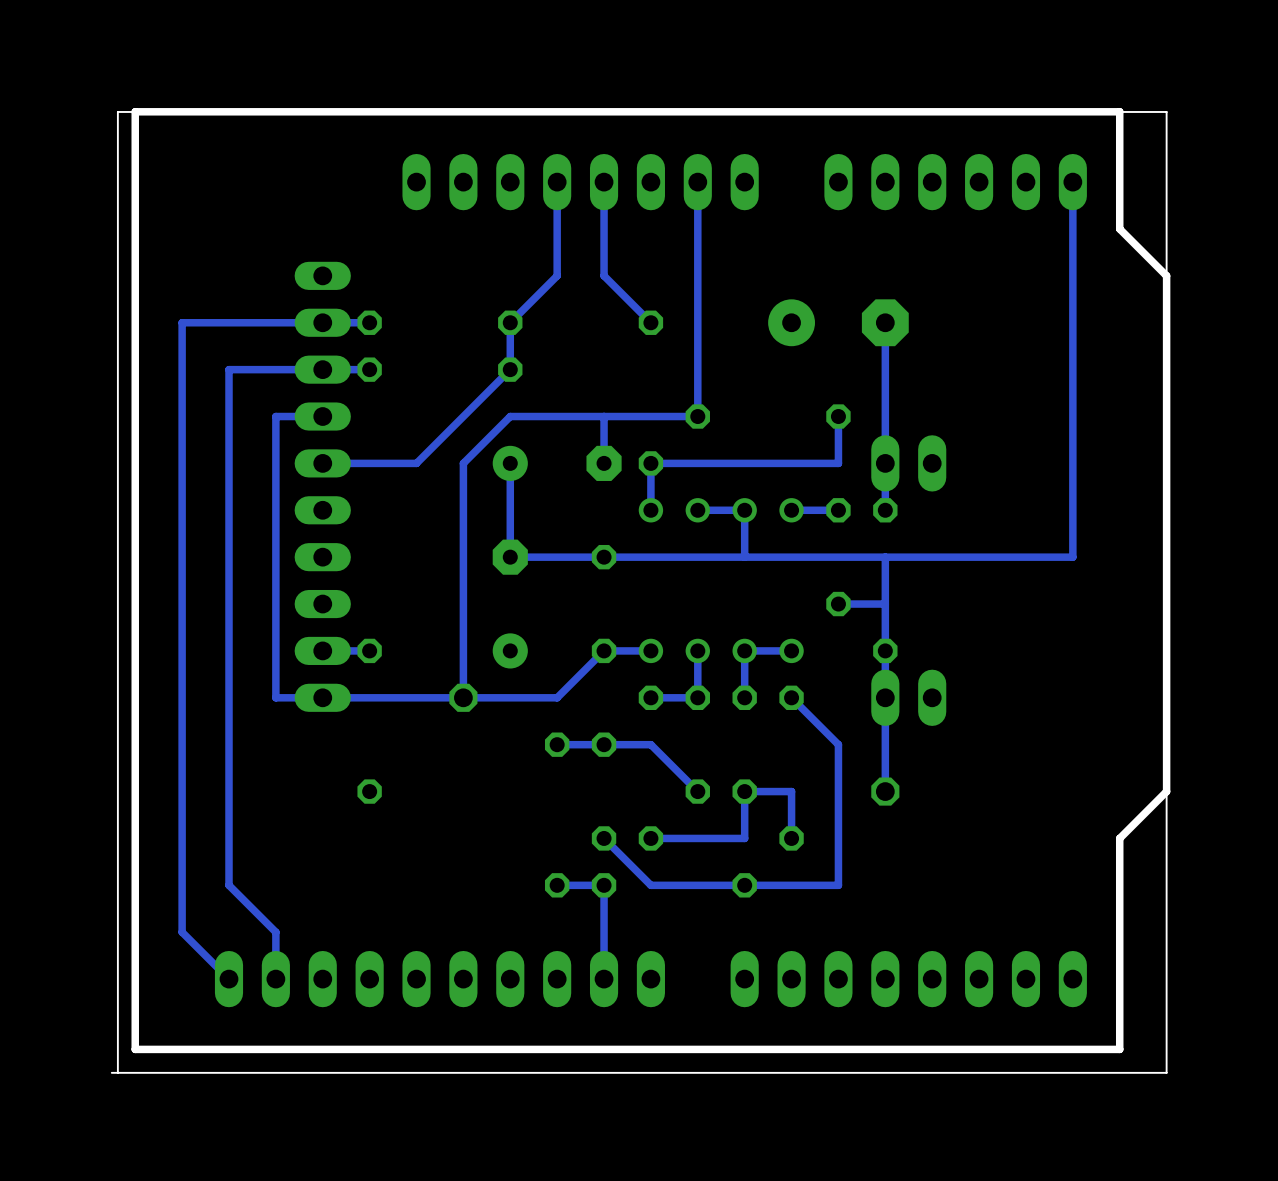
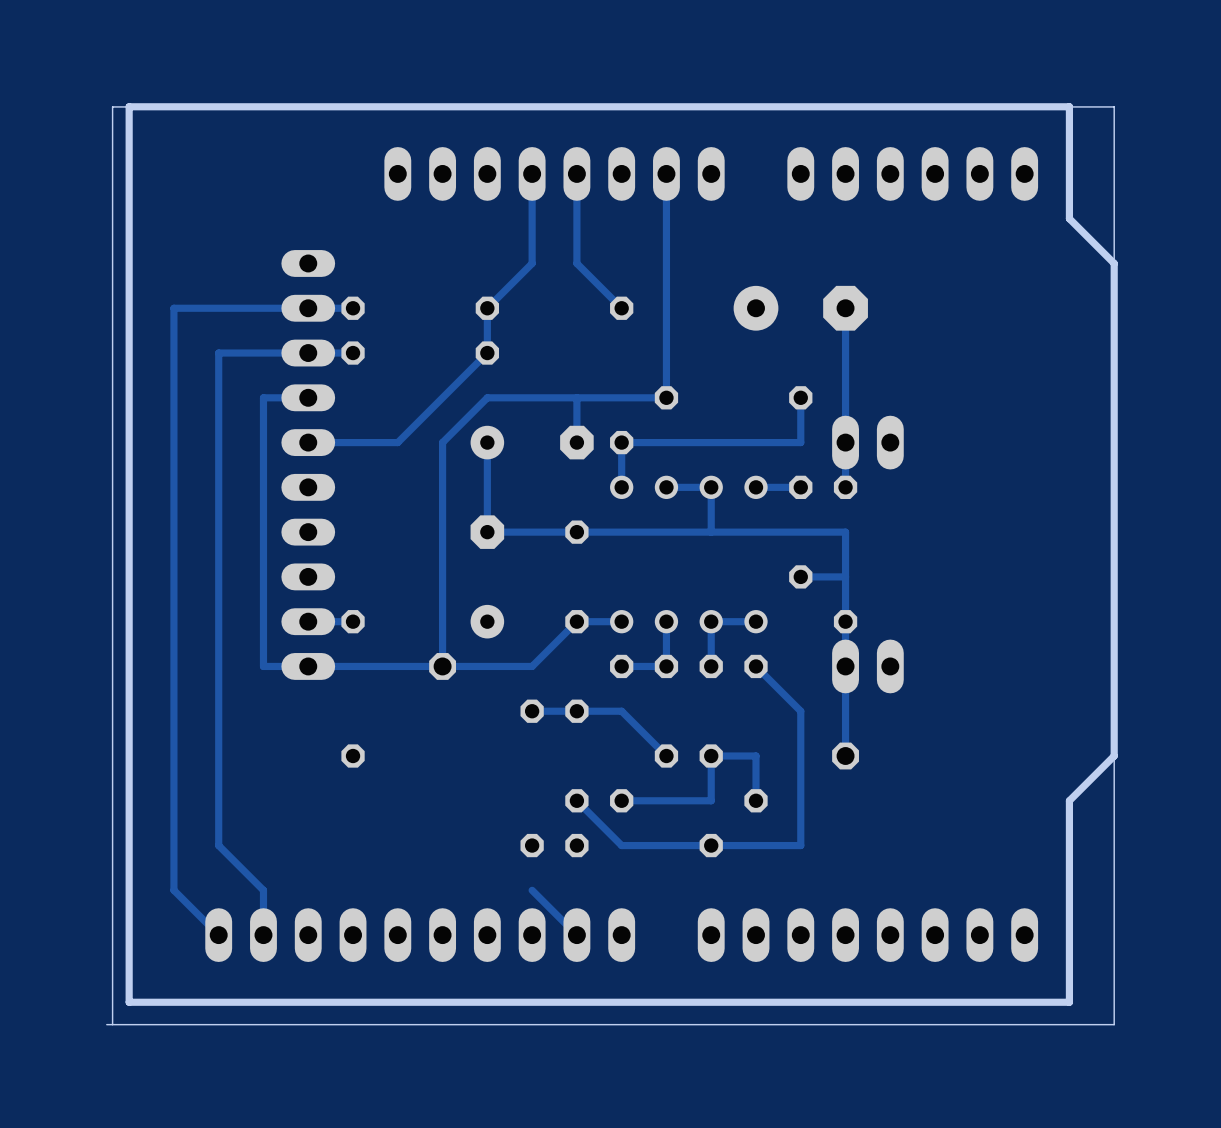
track: (1072, 182) (1072, 557) (885, 557) -> none
track: (557, 885) (604, 885) (604, 979) -> (532, 890) (576, 935)

